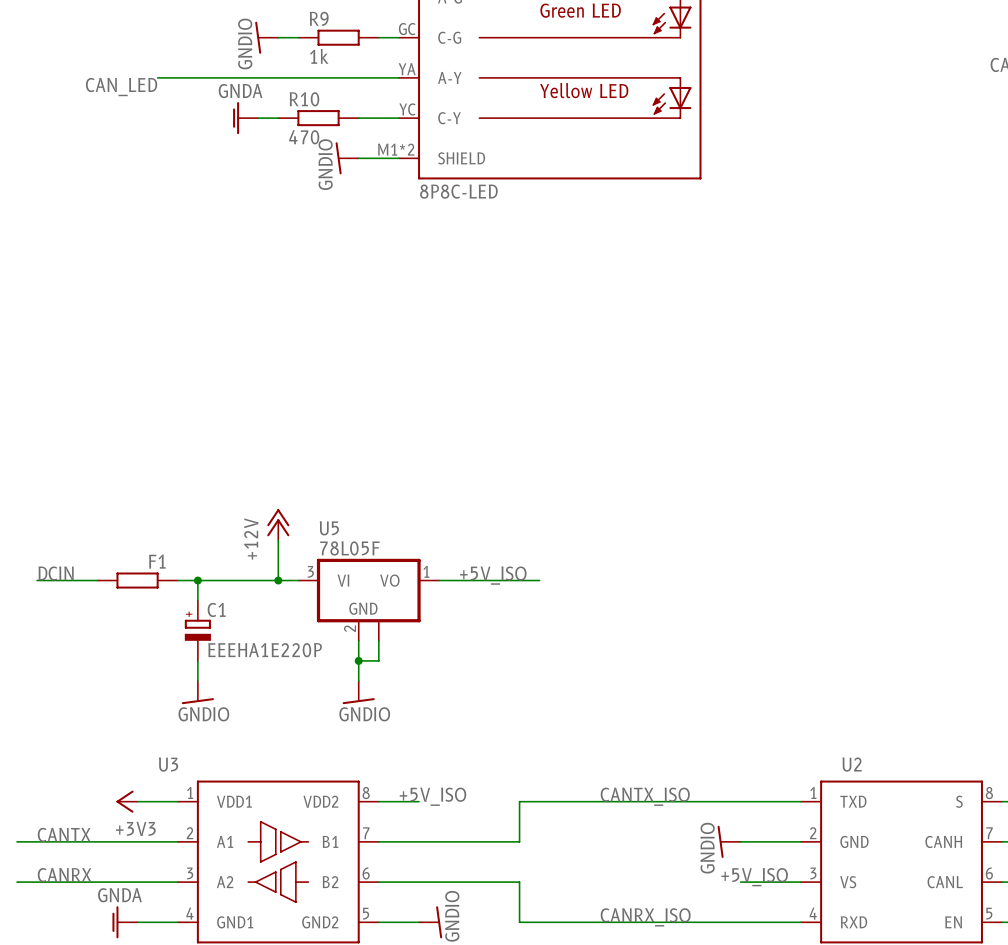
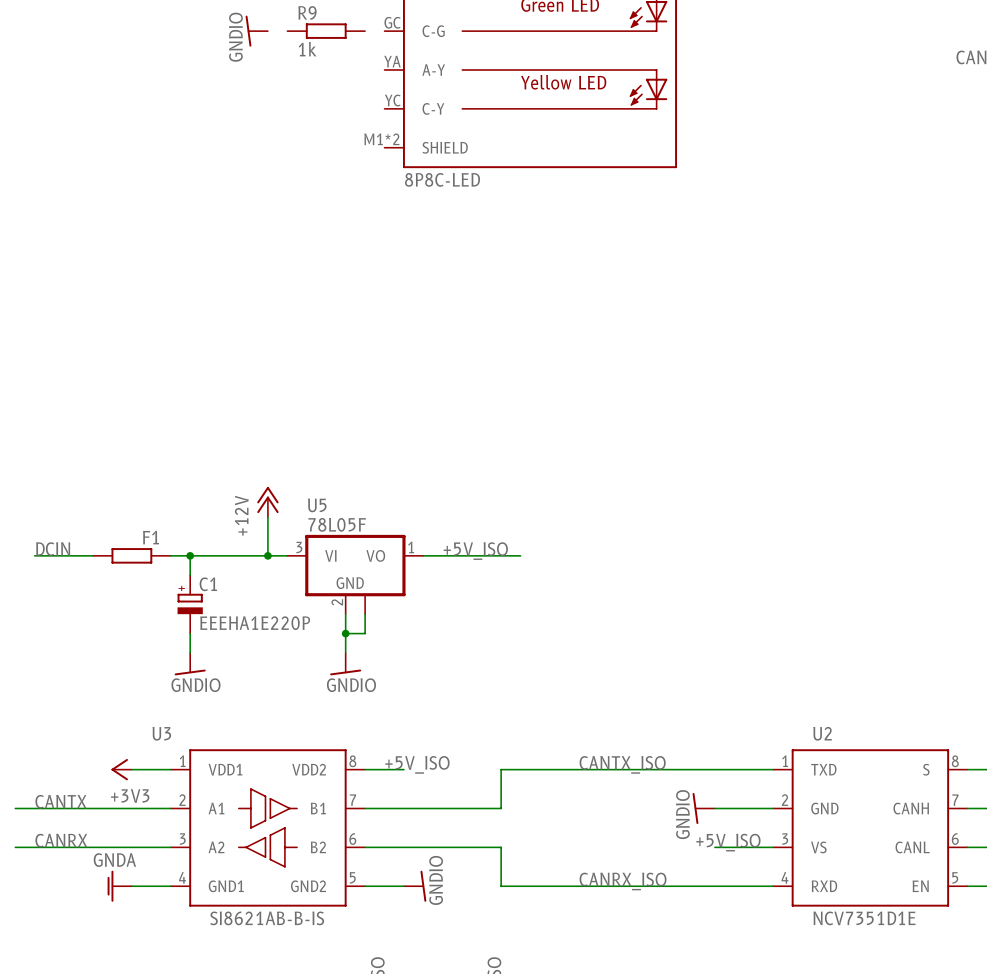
wire: (278, 37) (298, 37) -> none
wire: (378, 37) (398, 37) -> none
wire: (157, 77) (398, 77) -> none
label: CAN_LED (121, 87) -> none
power symbol: GNDA (245, 118) -> none
wire: (258, 118) (278, 118) -> none
R10: 470 (318, 118) -> none
wire: (358, 118) (398, 118) -> none
power symbol: GNDIO (347, 158) -> none
wire: (358, 158) (398, 158) -> none

